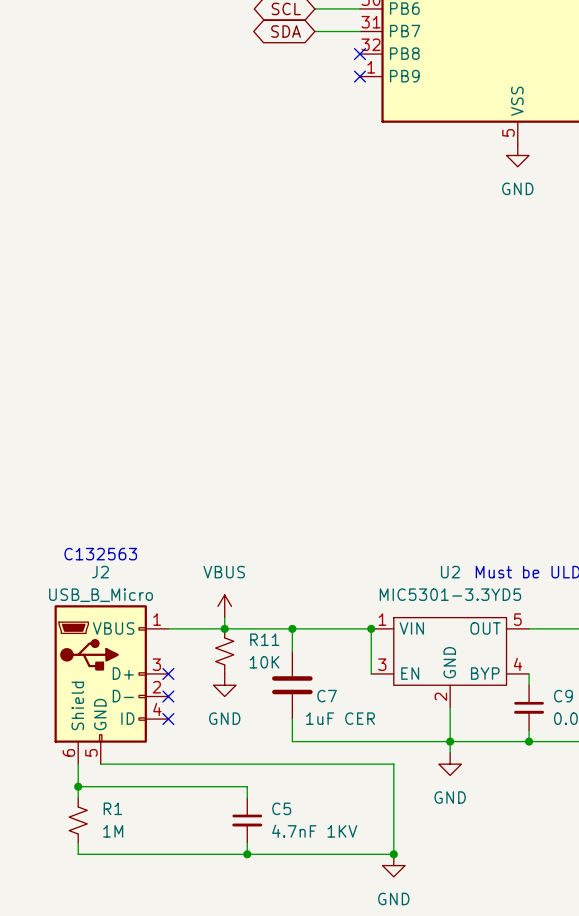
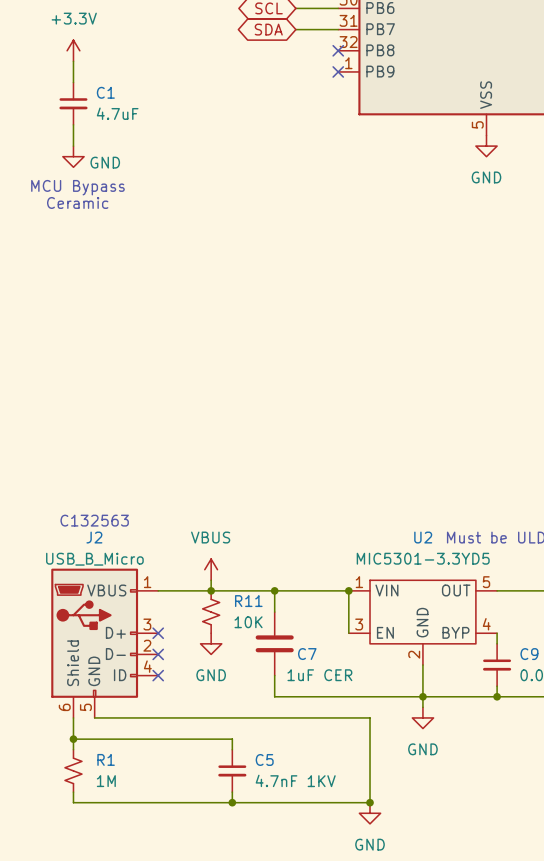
power symbol: none -> +3.3V (73, 50)
wire: none -> (73, 61) (73, 82)
C1: none -> 4.7uF (73, 103)
wire: none -> (73, 124) (73, 146)
power symbol: none -> GND (73, 156)
text: none -> MCU Bypass (77, 187)
text: none -> Ceramic (77, 202)

